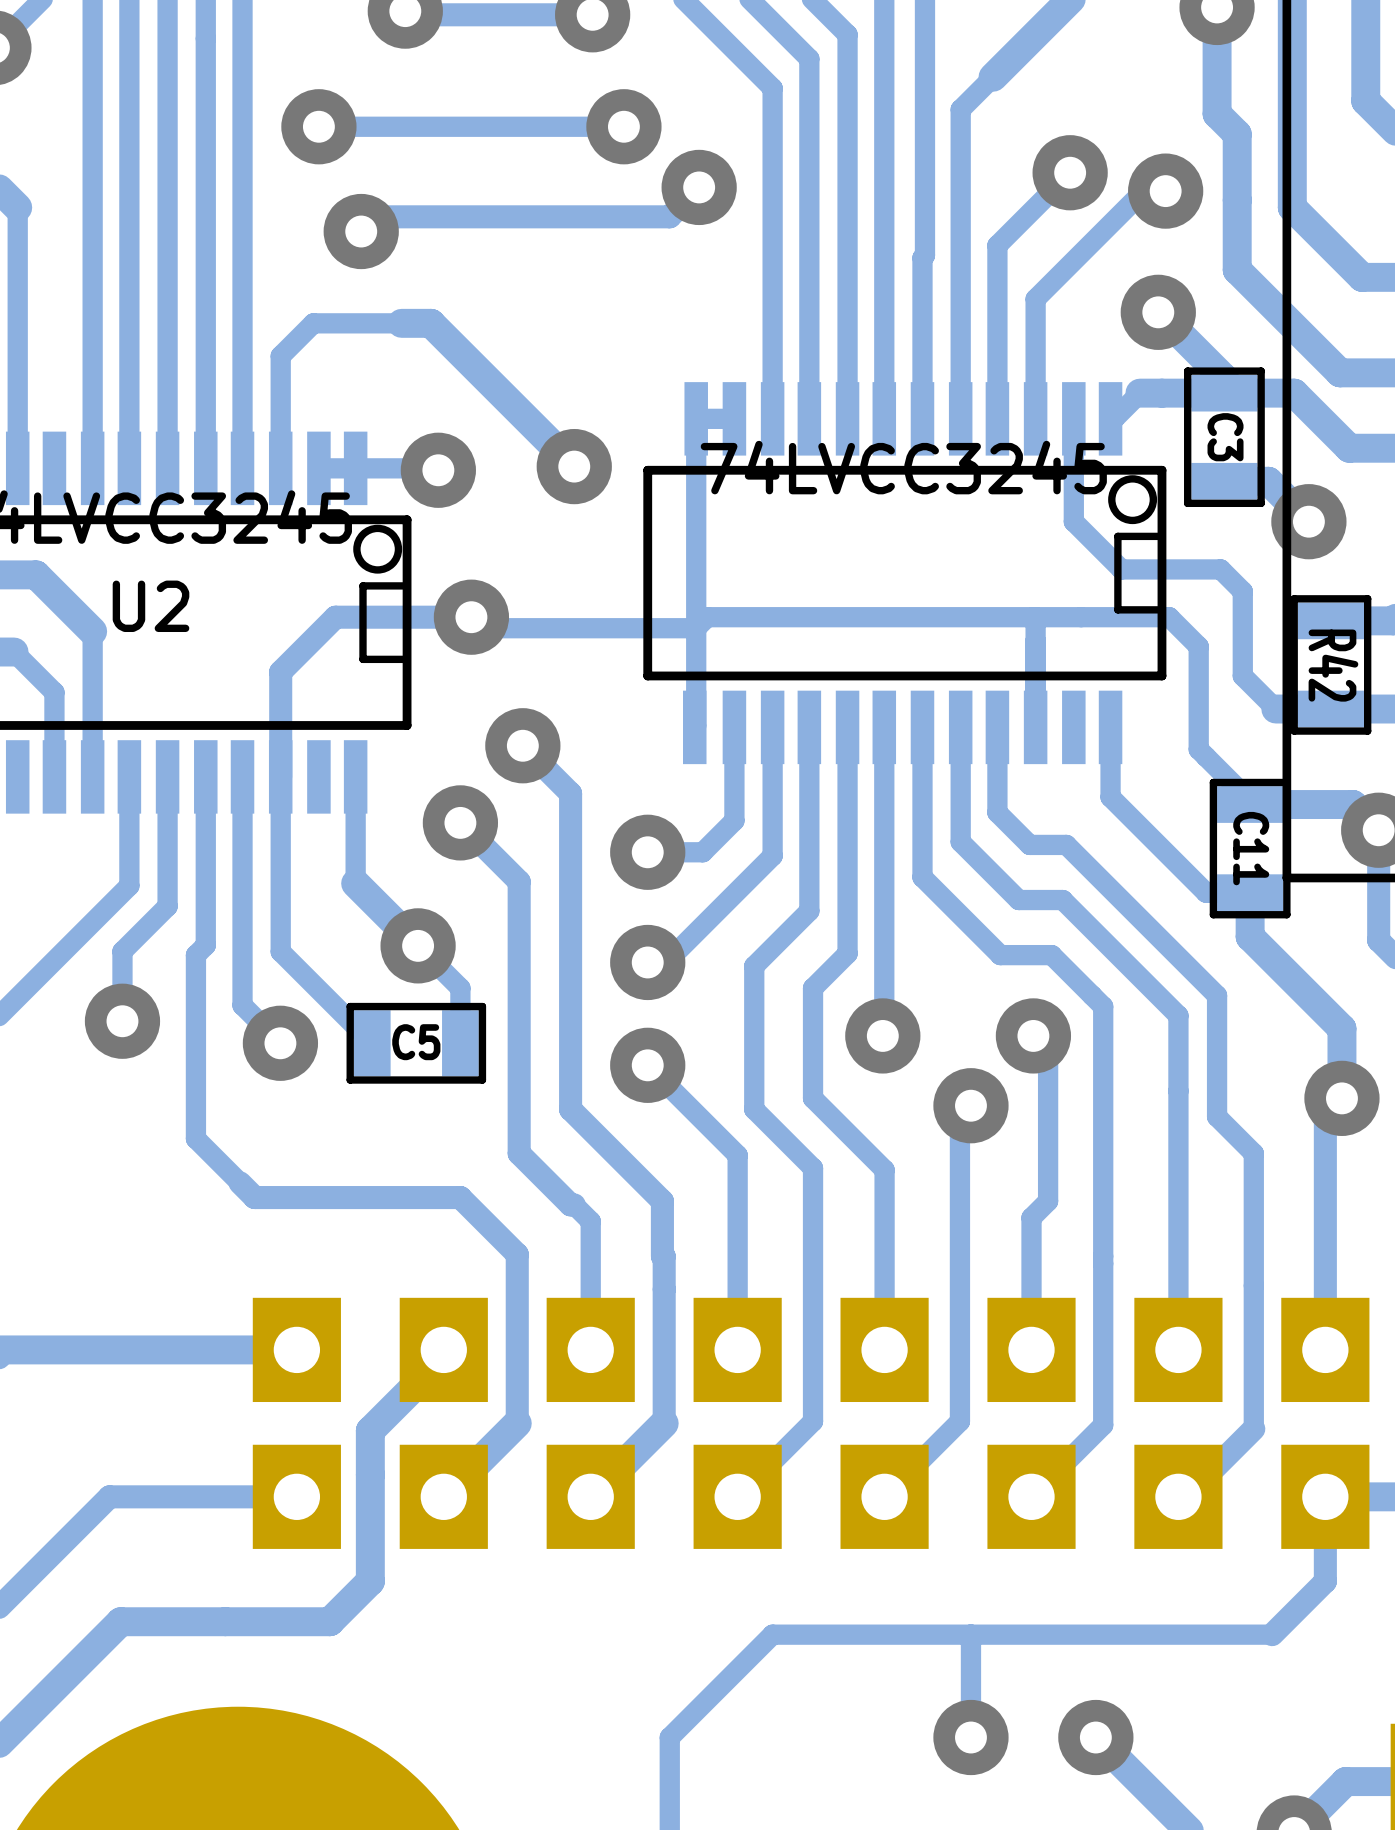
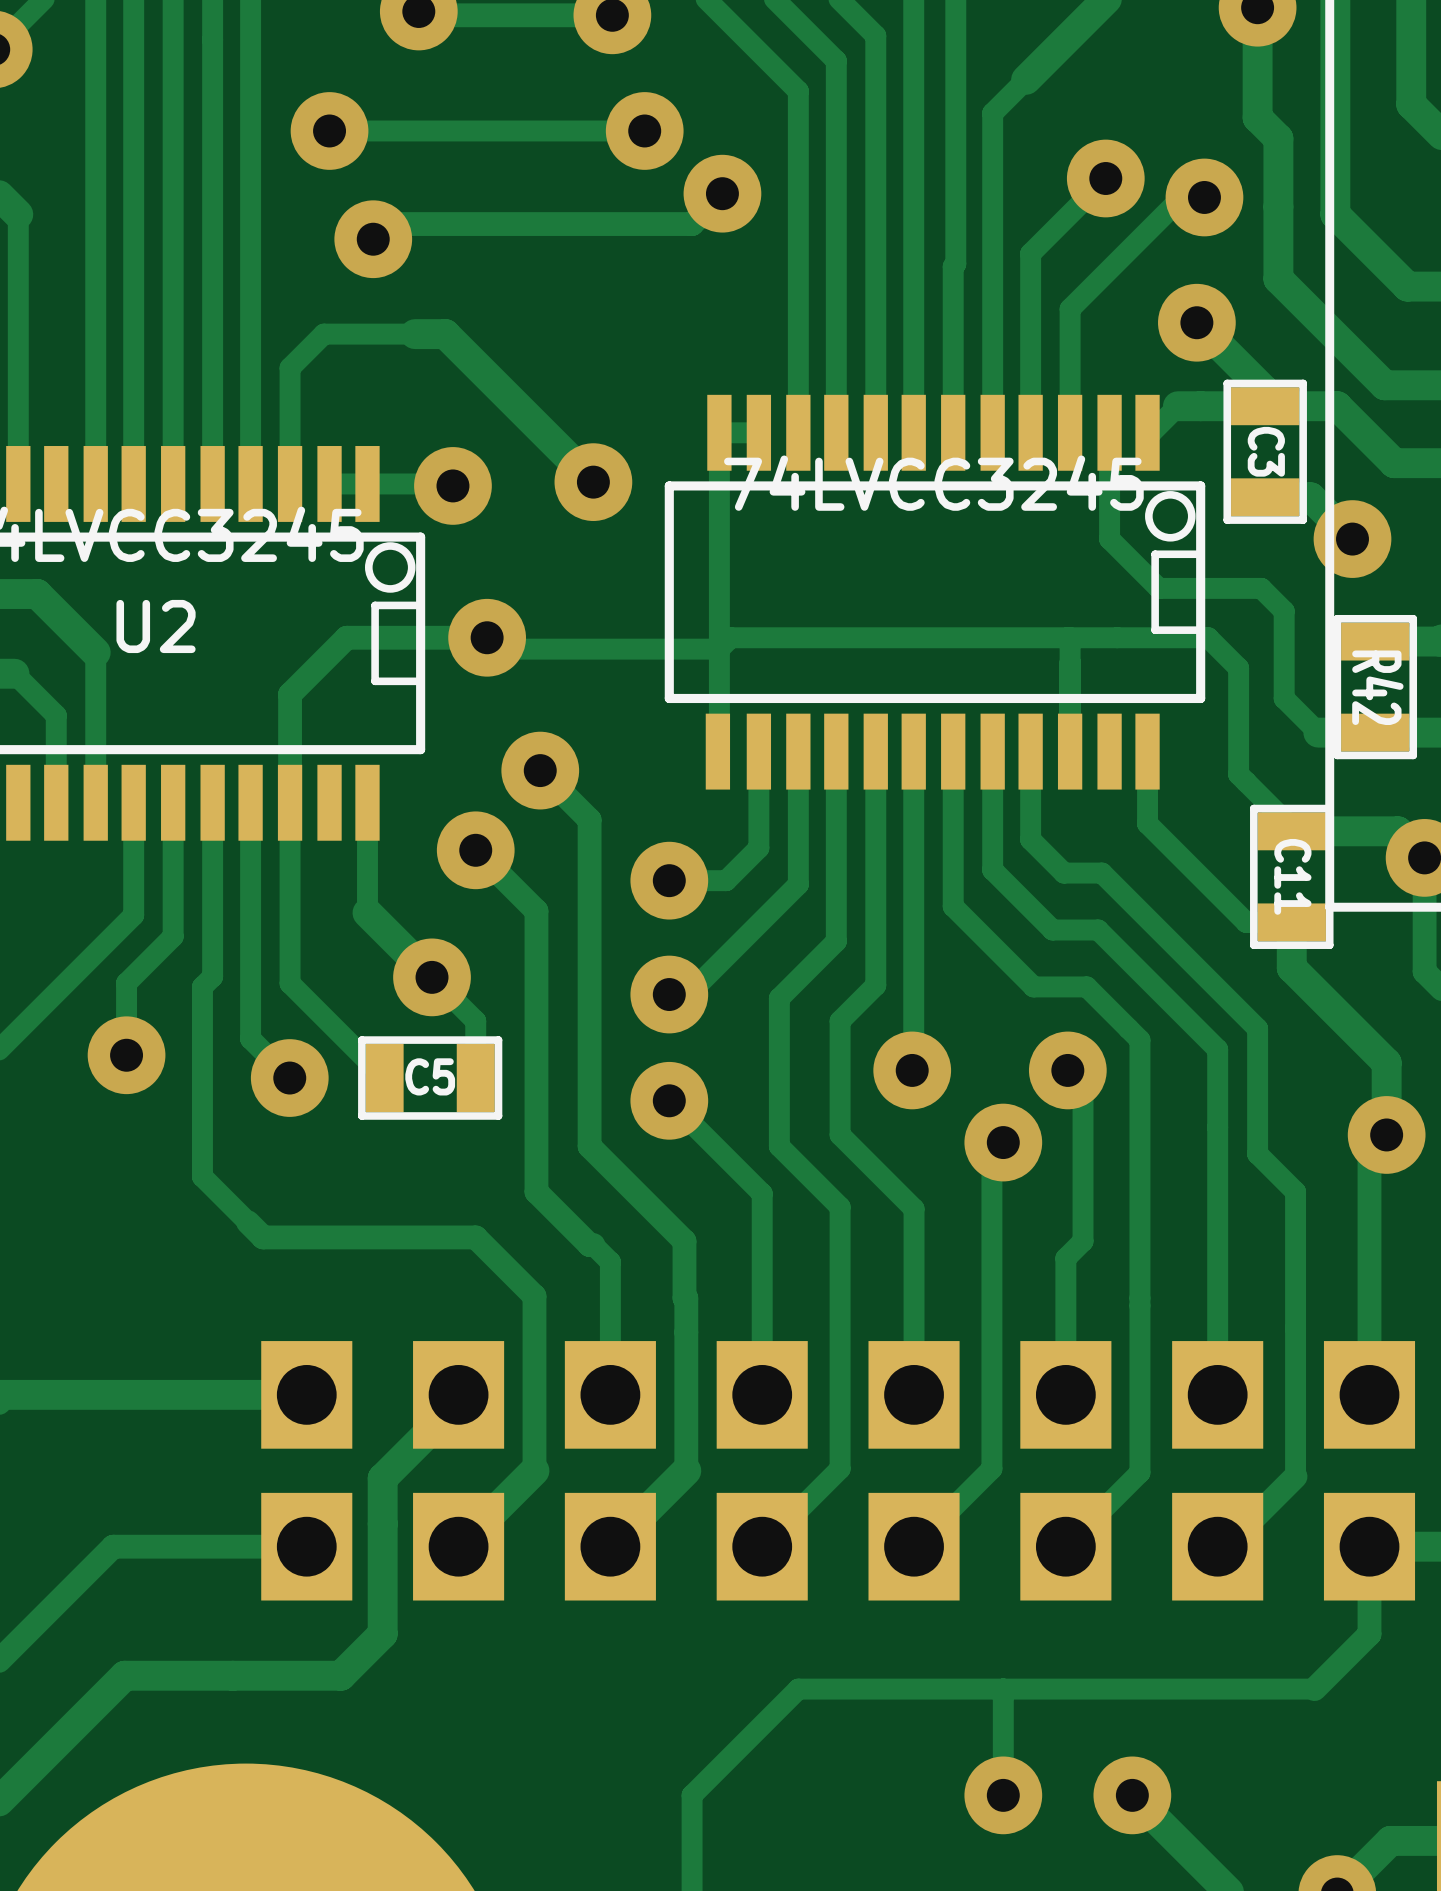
part footprint: [252, 1297, 1370, 1549] -> [261, 1341, 1416, 1601]

